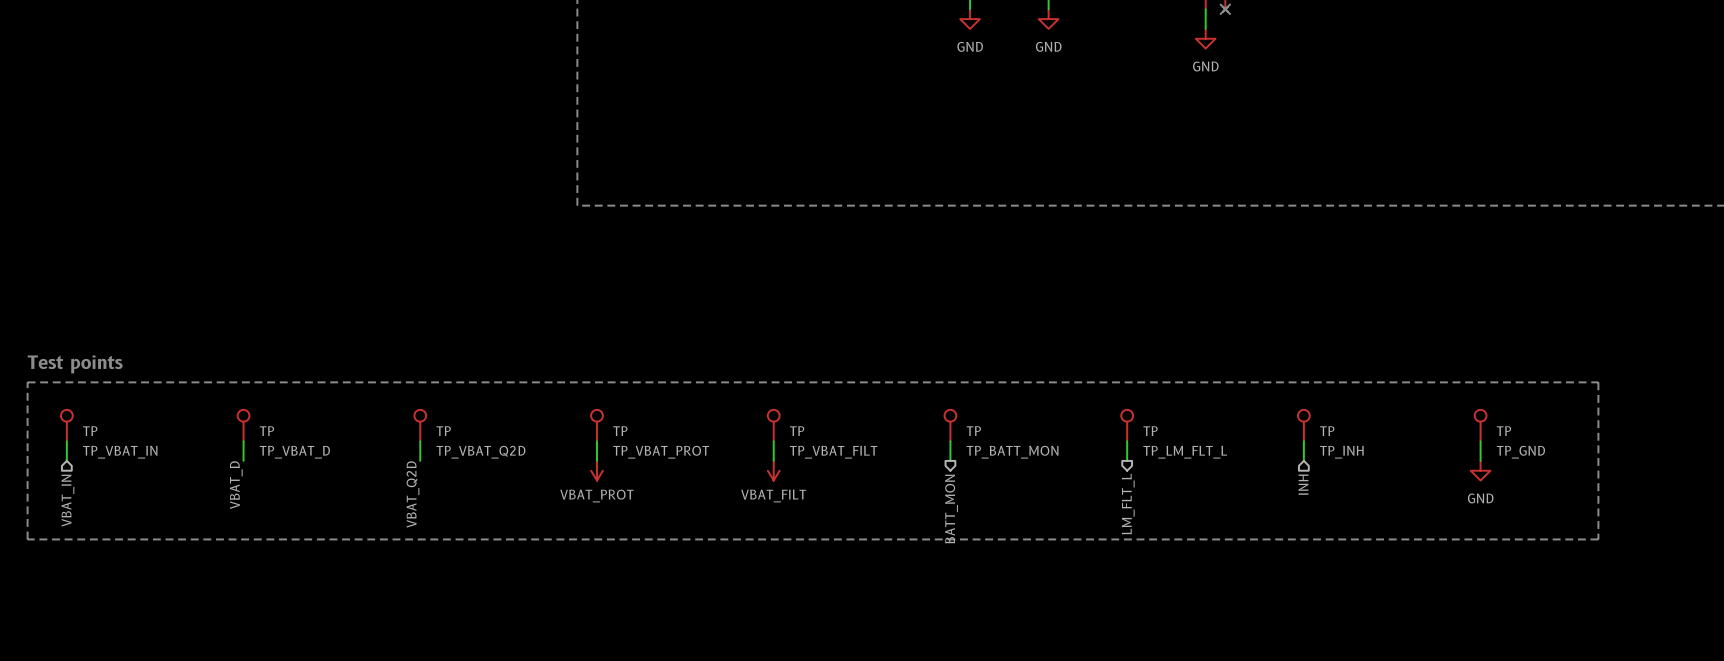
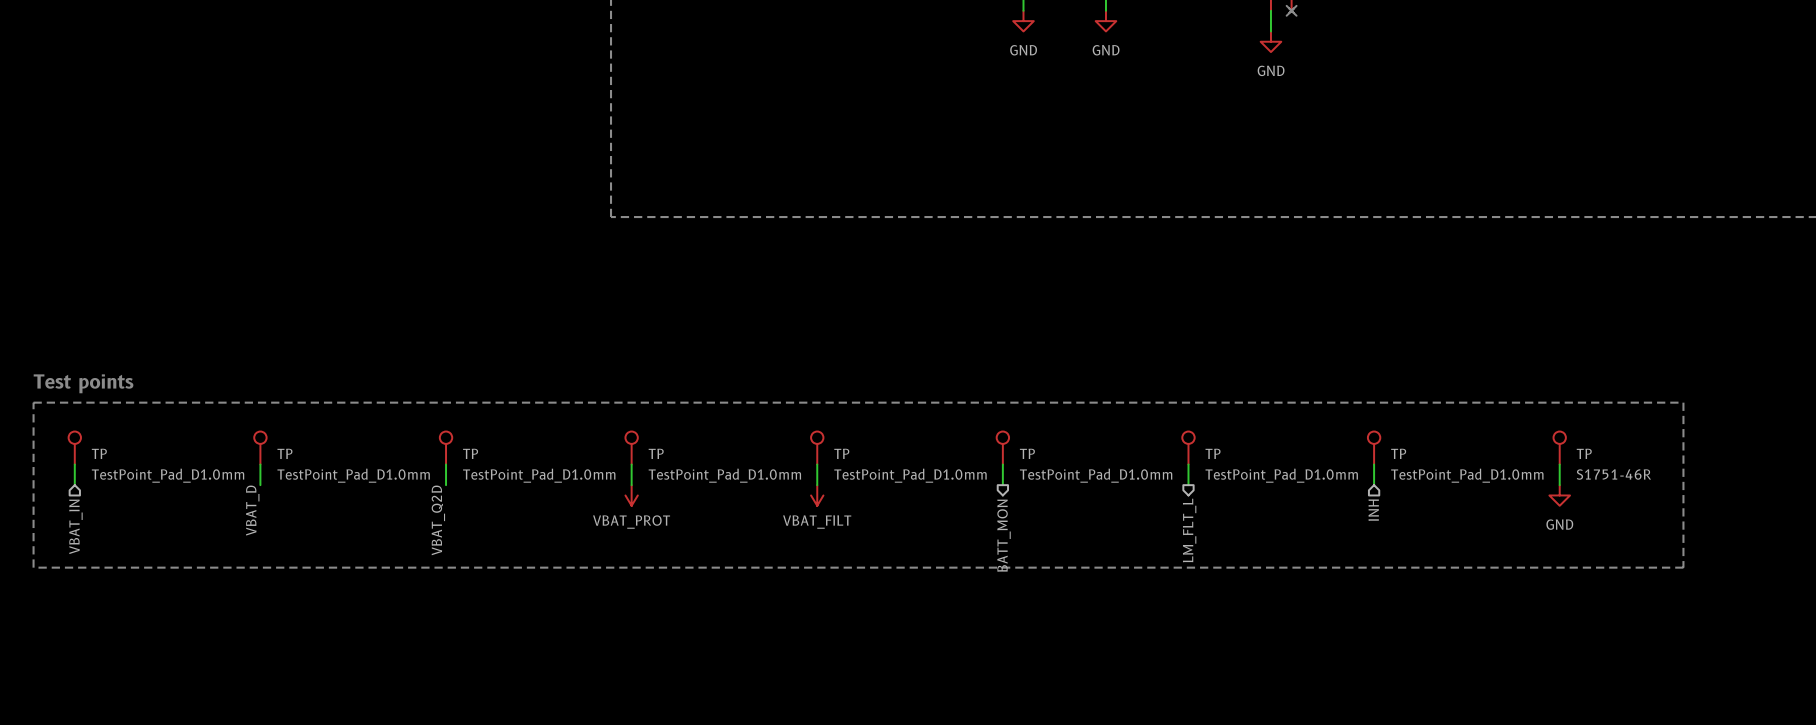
TP value: TP_VBAT_IN (120, 452) -> TestPoint_Pad_D1.0mm (168, 475)
TP value: TP_VBAT_D (294, 452) -> TestPoint_Pad_D1.0mm (353, 475)
TP value: TP_VBAT_Q2D (480, 452) -> TestPoint_Pad_D1.0mm (539, 475)
TP value: TP_VBAT_PROT (661, 452) -> TestPoint_Pad_D1.0mm (724, 475)
TP value: TP_VBAT_FILT (833, 452) -> TestPoint_Pad_D1.0mm (910, 475)
TP value: TP_BATT_MON (1012, 452) -> TestPoint_Pad_D1.0mm (1096, 475)
TP value: TP_LM_FLT_L (1185, 452) -> TestPoint_Pad_D1.0mm (1281, 475)
TP value: TP_INH (1341, 452) -> TestPoint_Pad_D1.0mm (1467, 475)
TP value: TP_GND (1520, 452) -> S1751-46R (1613, 474)

